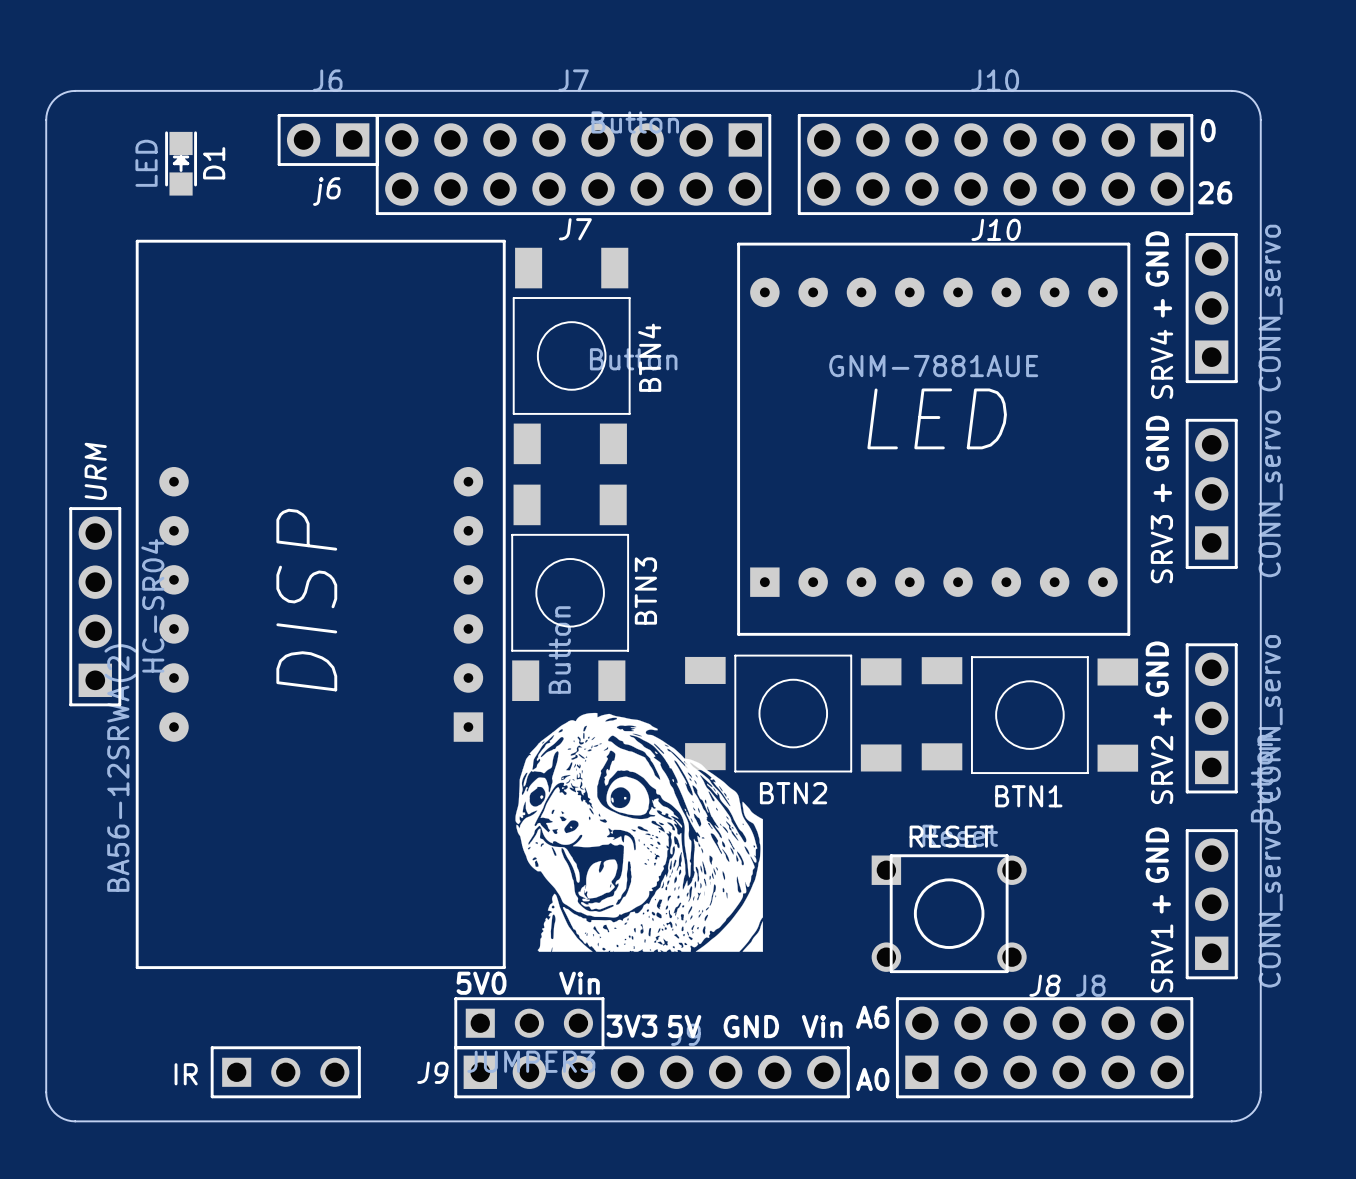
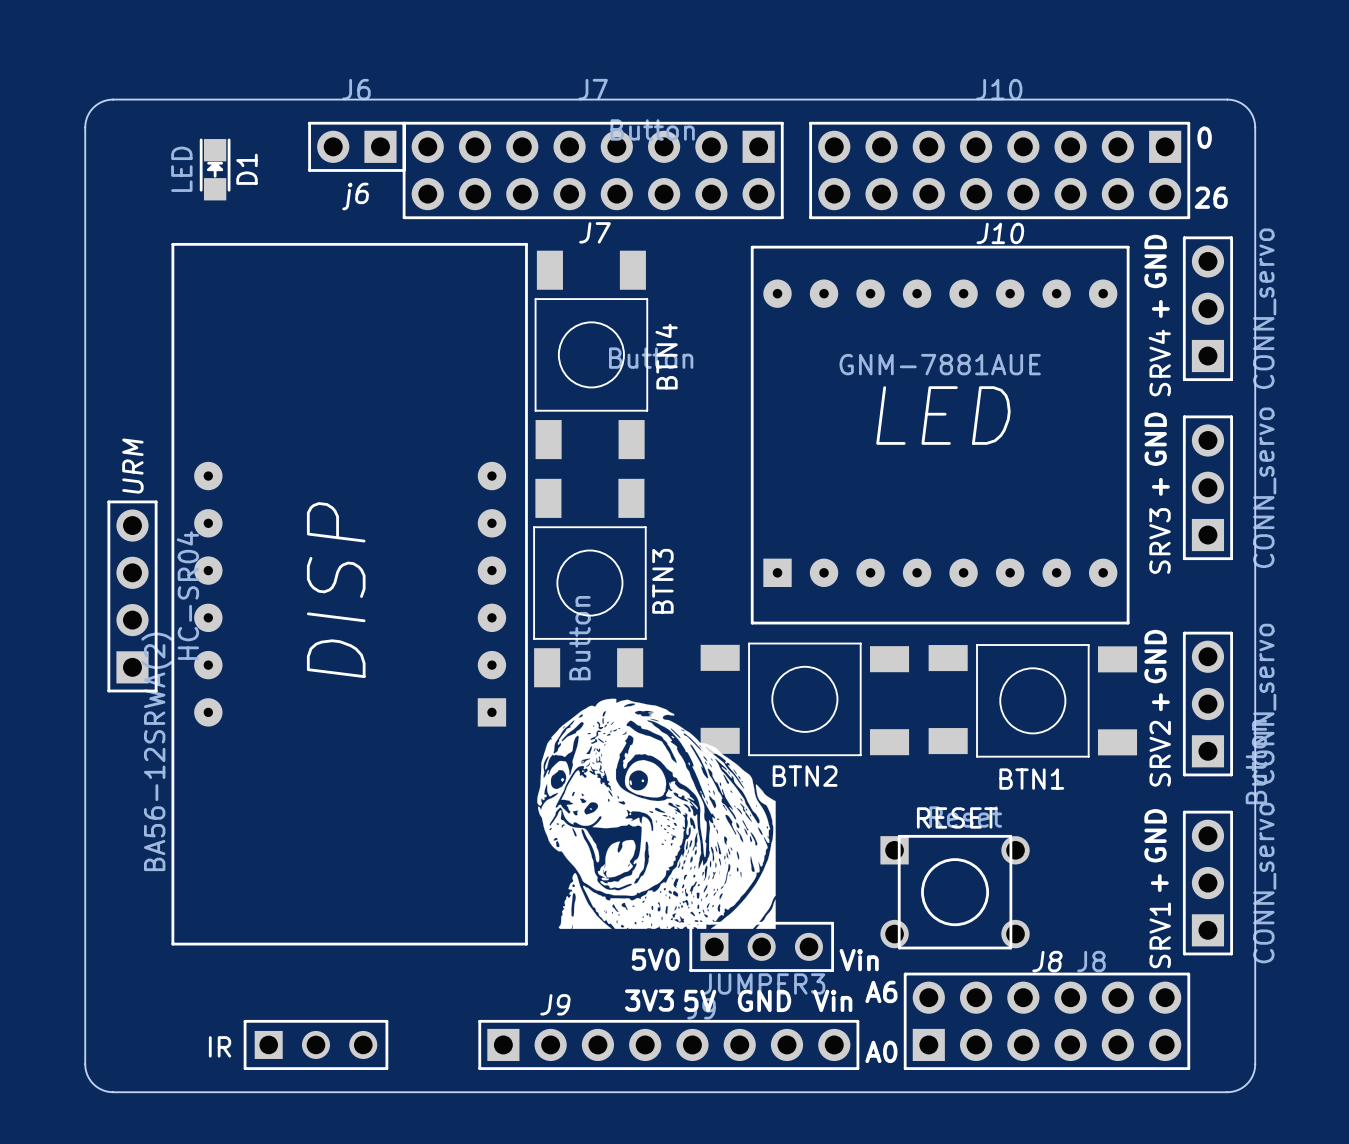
text position: 5V0 (481, 983) -> 5V0 (655, 959)
text position: Vin (579, 983) -> Vin (859, 960)
part position: (529, 1023) -> (761, 946)
J9 name position: J9 (432, 1072) -> J9 (555, 1004)

